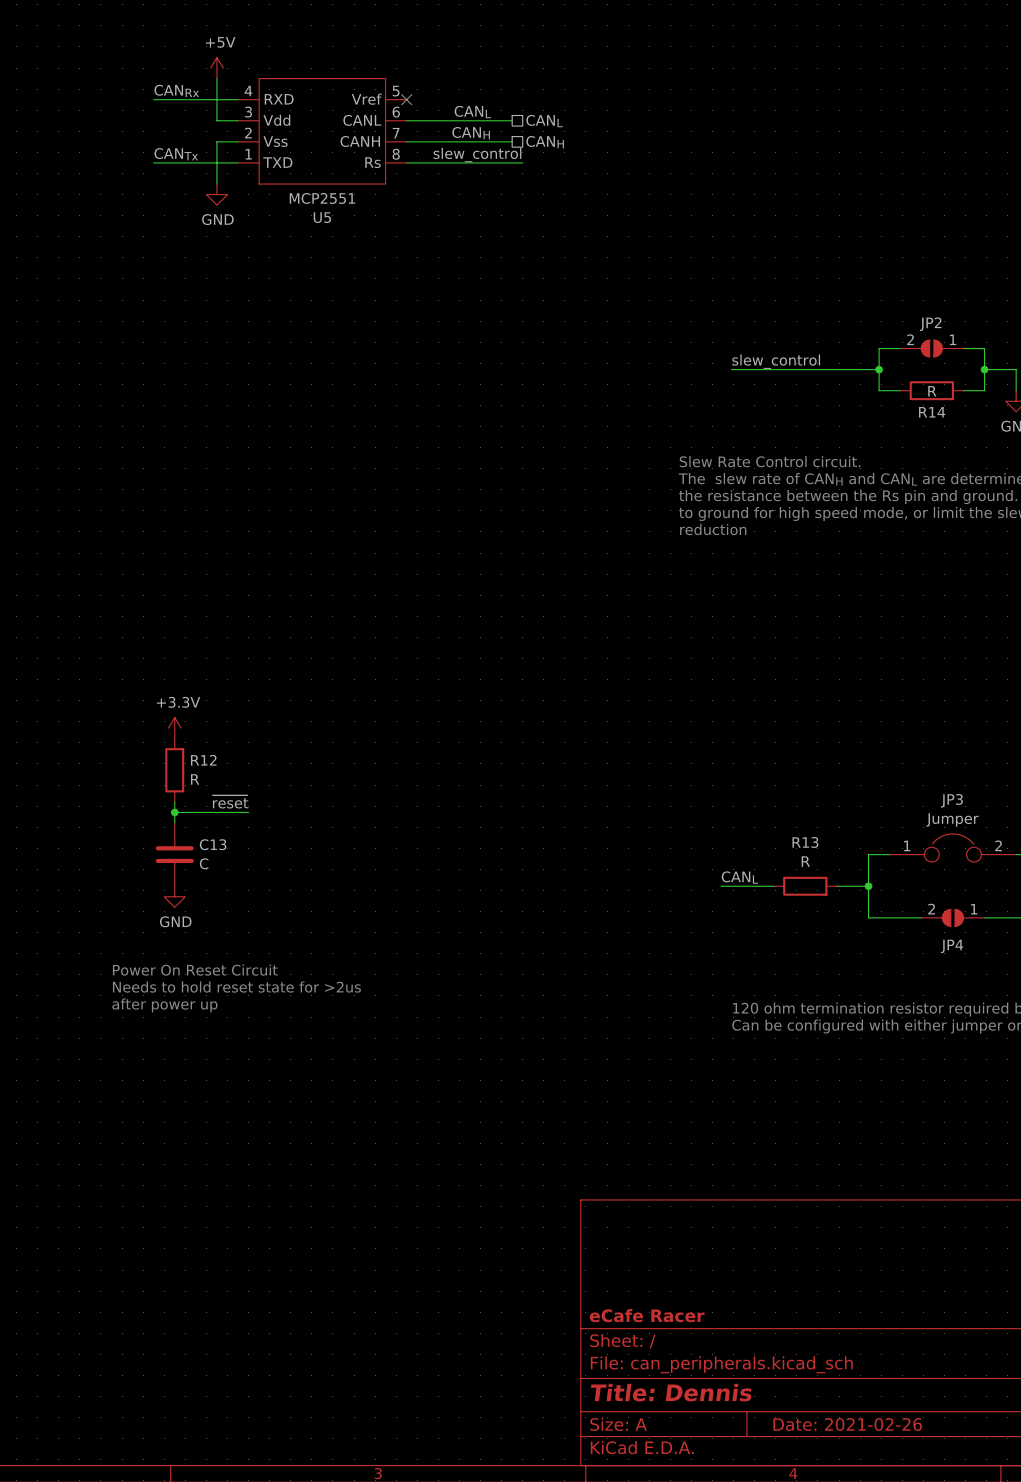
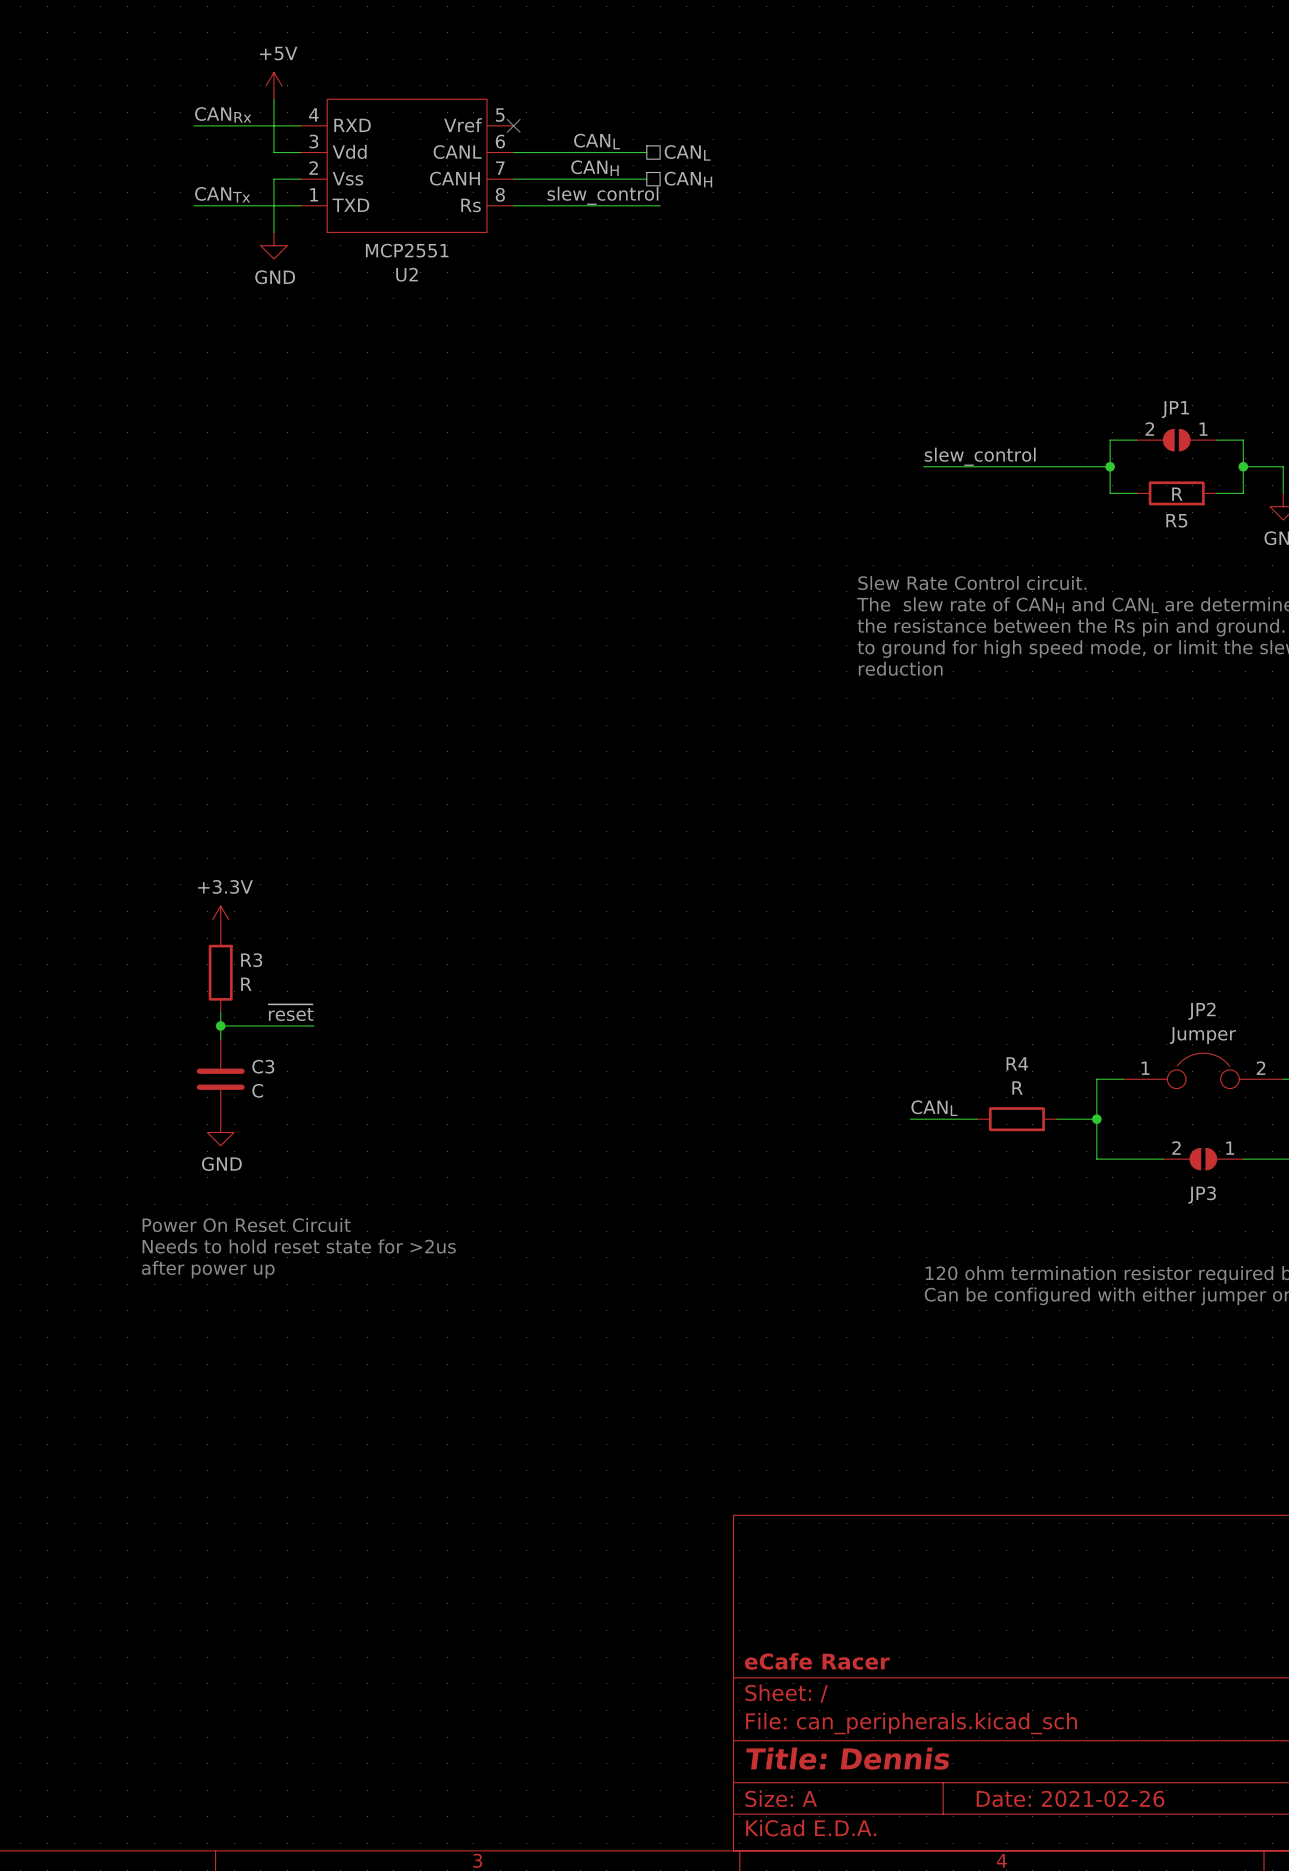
U5 name: U5 (322, 217) -> U2 (407, 274)
JP2 name: JP2 (930, 324) -> JP1 (1175, 409)
R14 name: R14 (932, 412) -> R5 (1176, 520)
R12 name: R12 (203, 760) -> R3 (251, 960)
JP3 name: JP3 (951, 800) -> JP2 (1201, 1011)
R13 name: R13 (805, 842) -> R4 (1017, 1063)
C13 name: C13 (213, 844) -> C3 (263, 1066)
JP4 name: JP4 (952, 946) -> JP3 (1202, 1195)

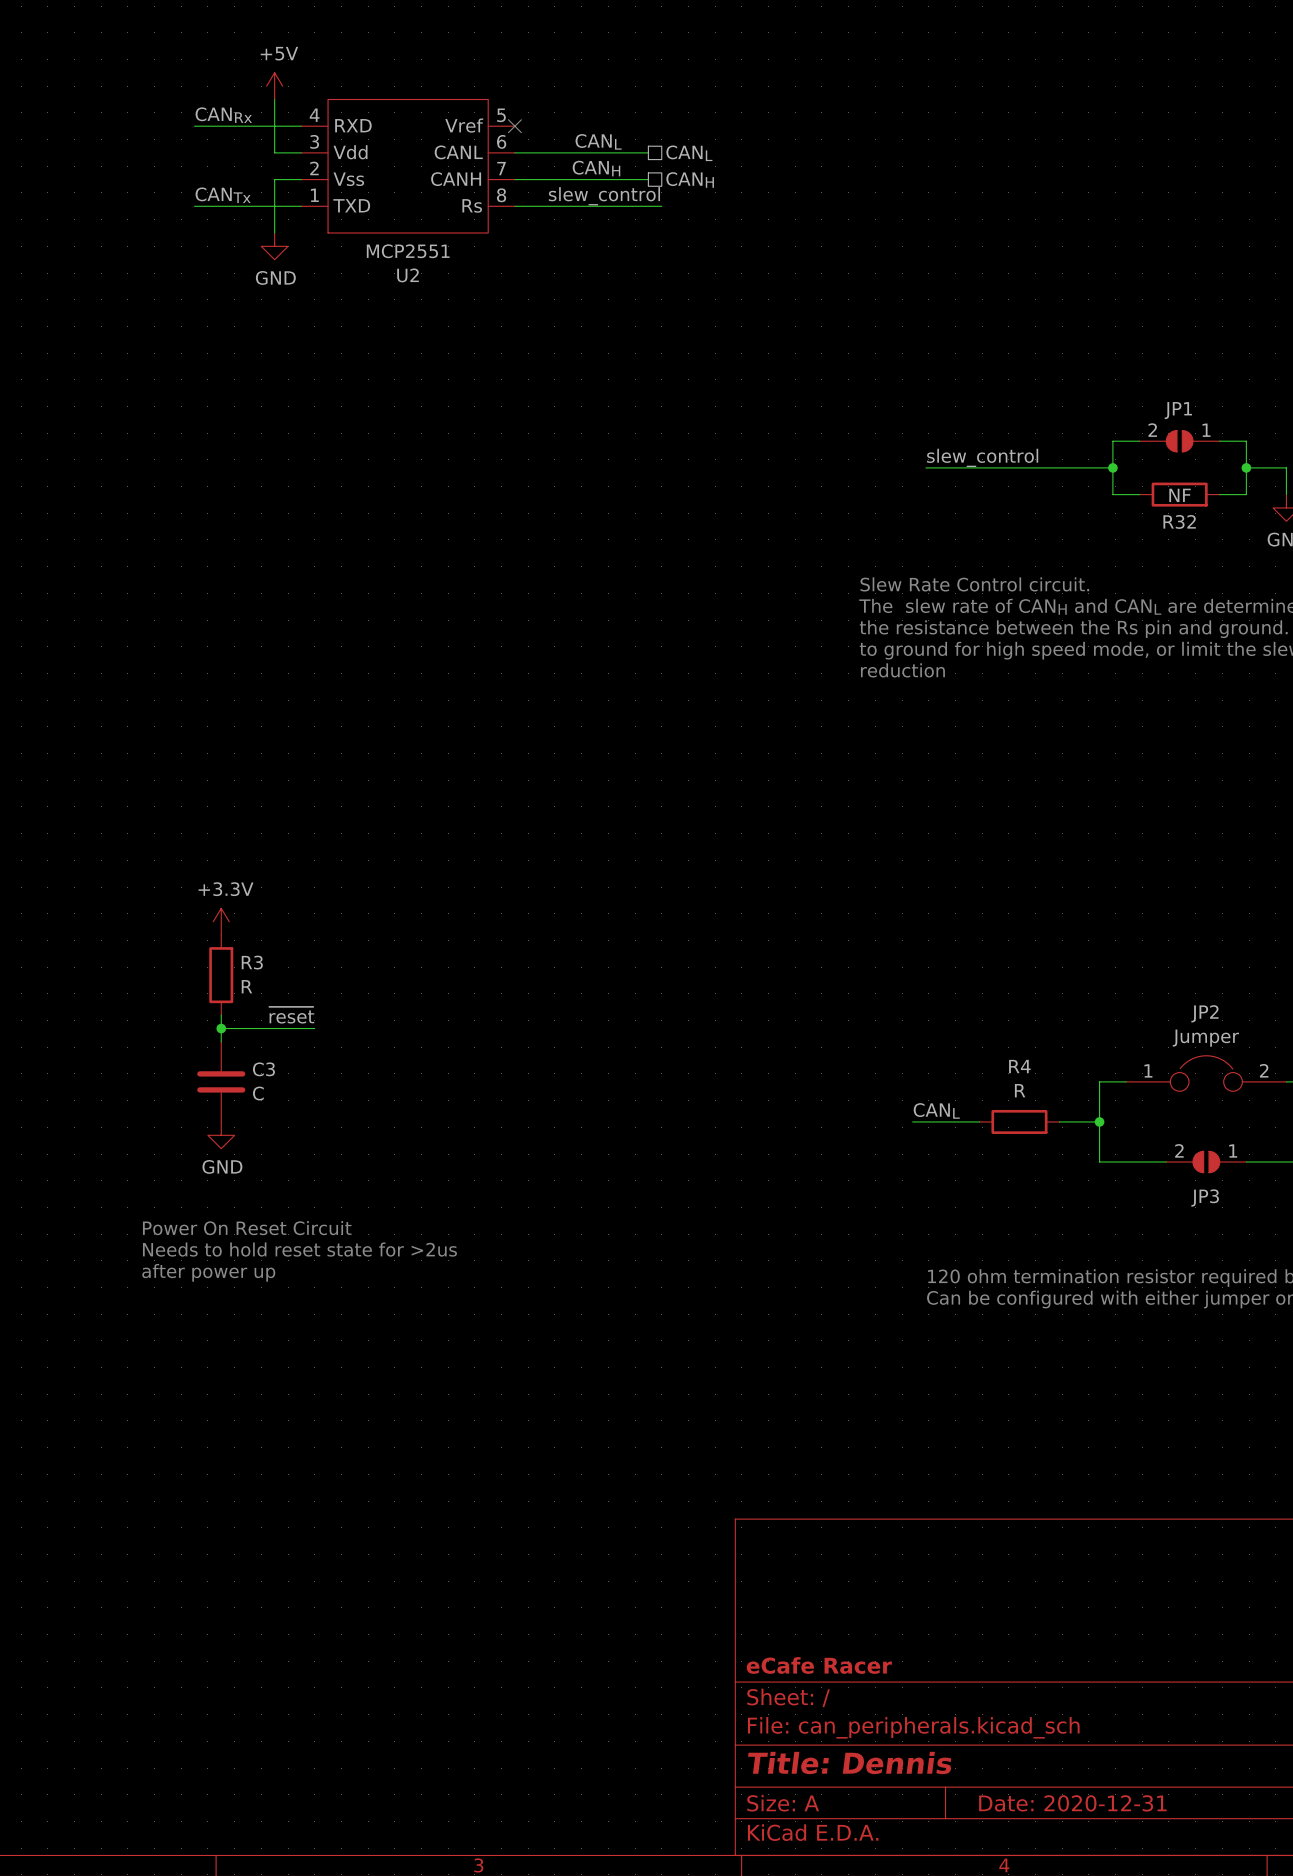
R5 value: R (1177, 494) -> NF (1180, 495)
R5 name: R5 (1176, 520) -> R32 (1179, 521)
title block: Date: 2021-02-26 (1070, 1798) -> Date: 2020-12-31 (1072, 1803)

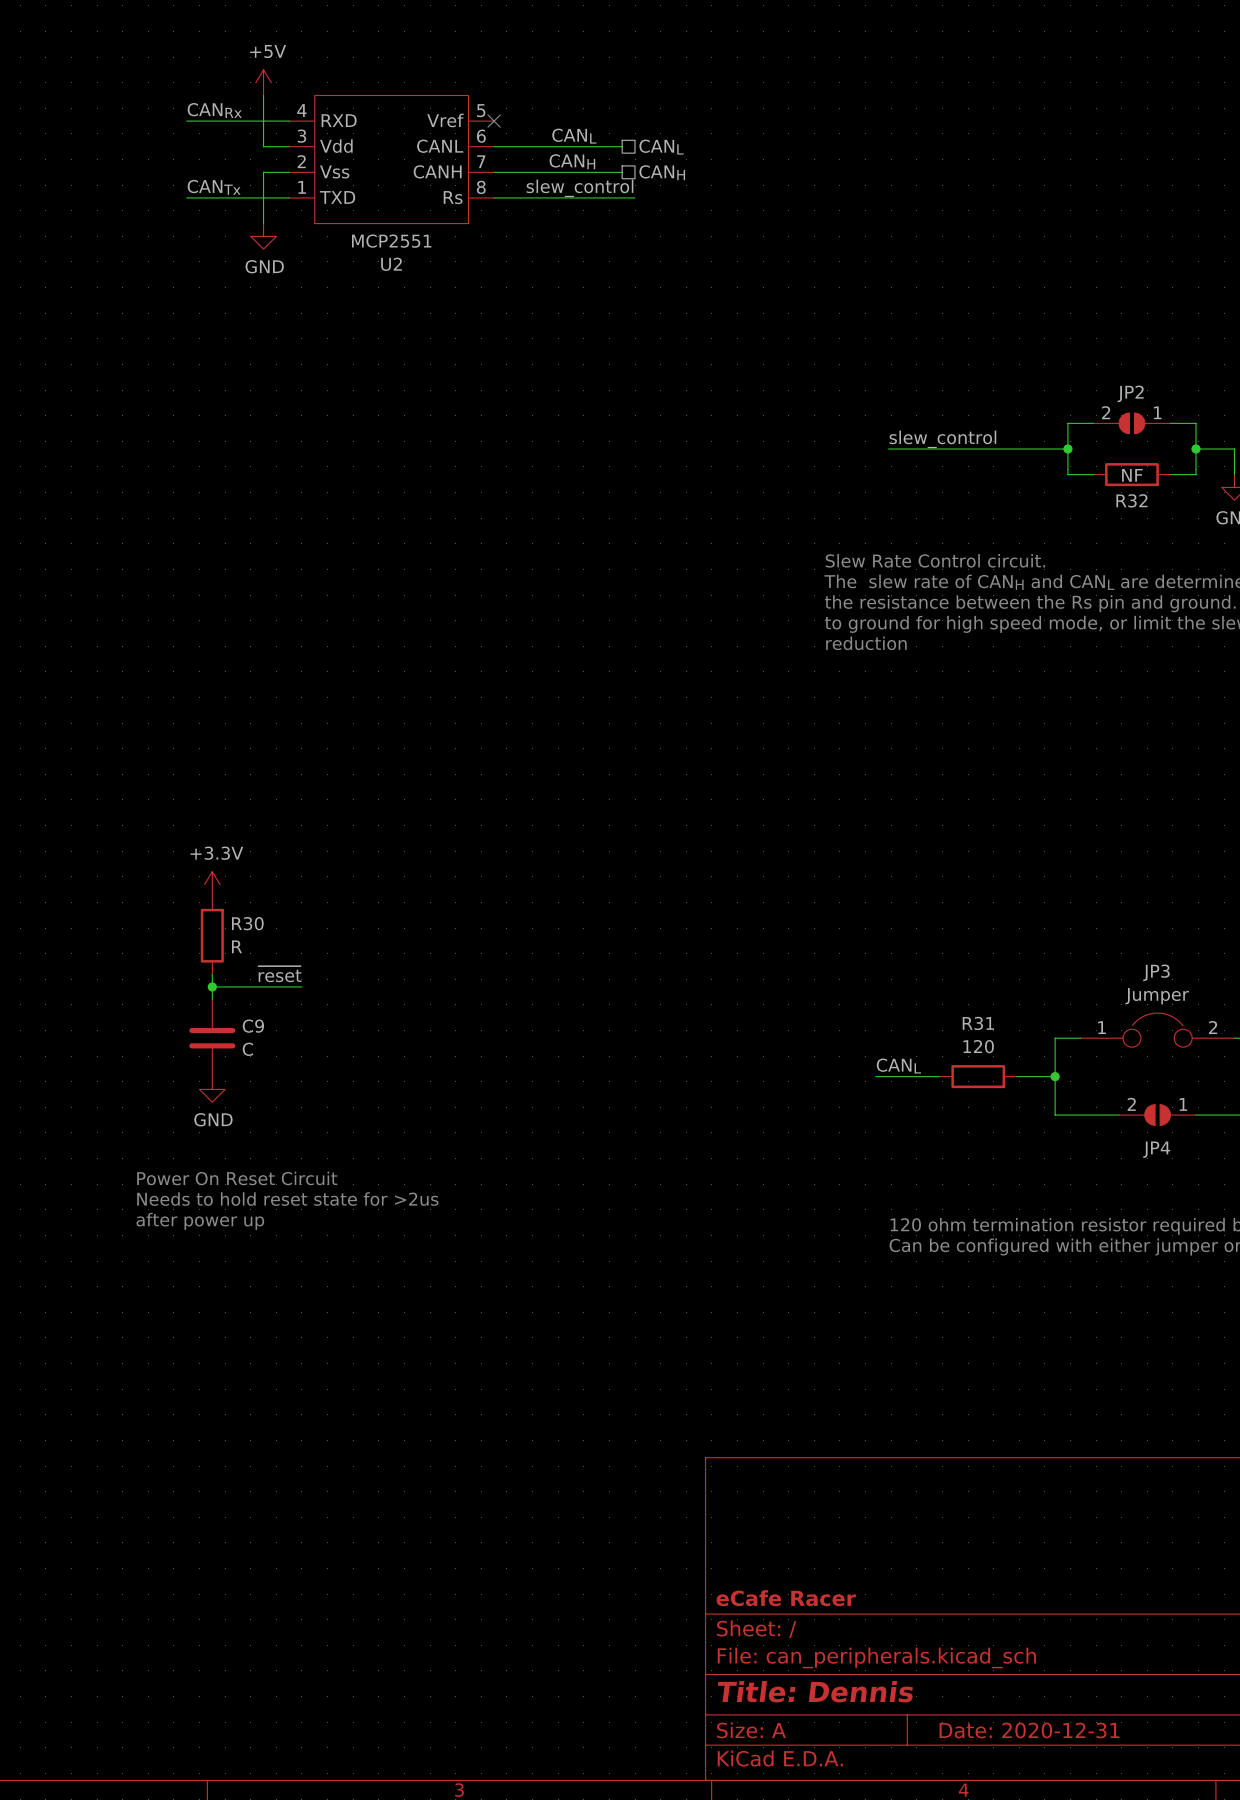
JP1 name: JP1 (1178, 410) -> JP2 (1130, 393)
R3 name: R3 (252, 962) -> R30 (247, 923)
JP2 name: JP2 (1204, 1013) -> JP3 (1156, 972)
R4 name: R4 (1019, 1066) -> R31 (978, 1023)
C3 name: C3 (263, 1069) -> C9 (253, 1026)
R4 value: R (1020, 1090) -> 120 (978, 1046)
JP3 name: JP3 (1205, 1197) -> JP4 (1156, 1149)

